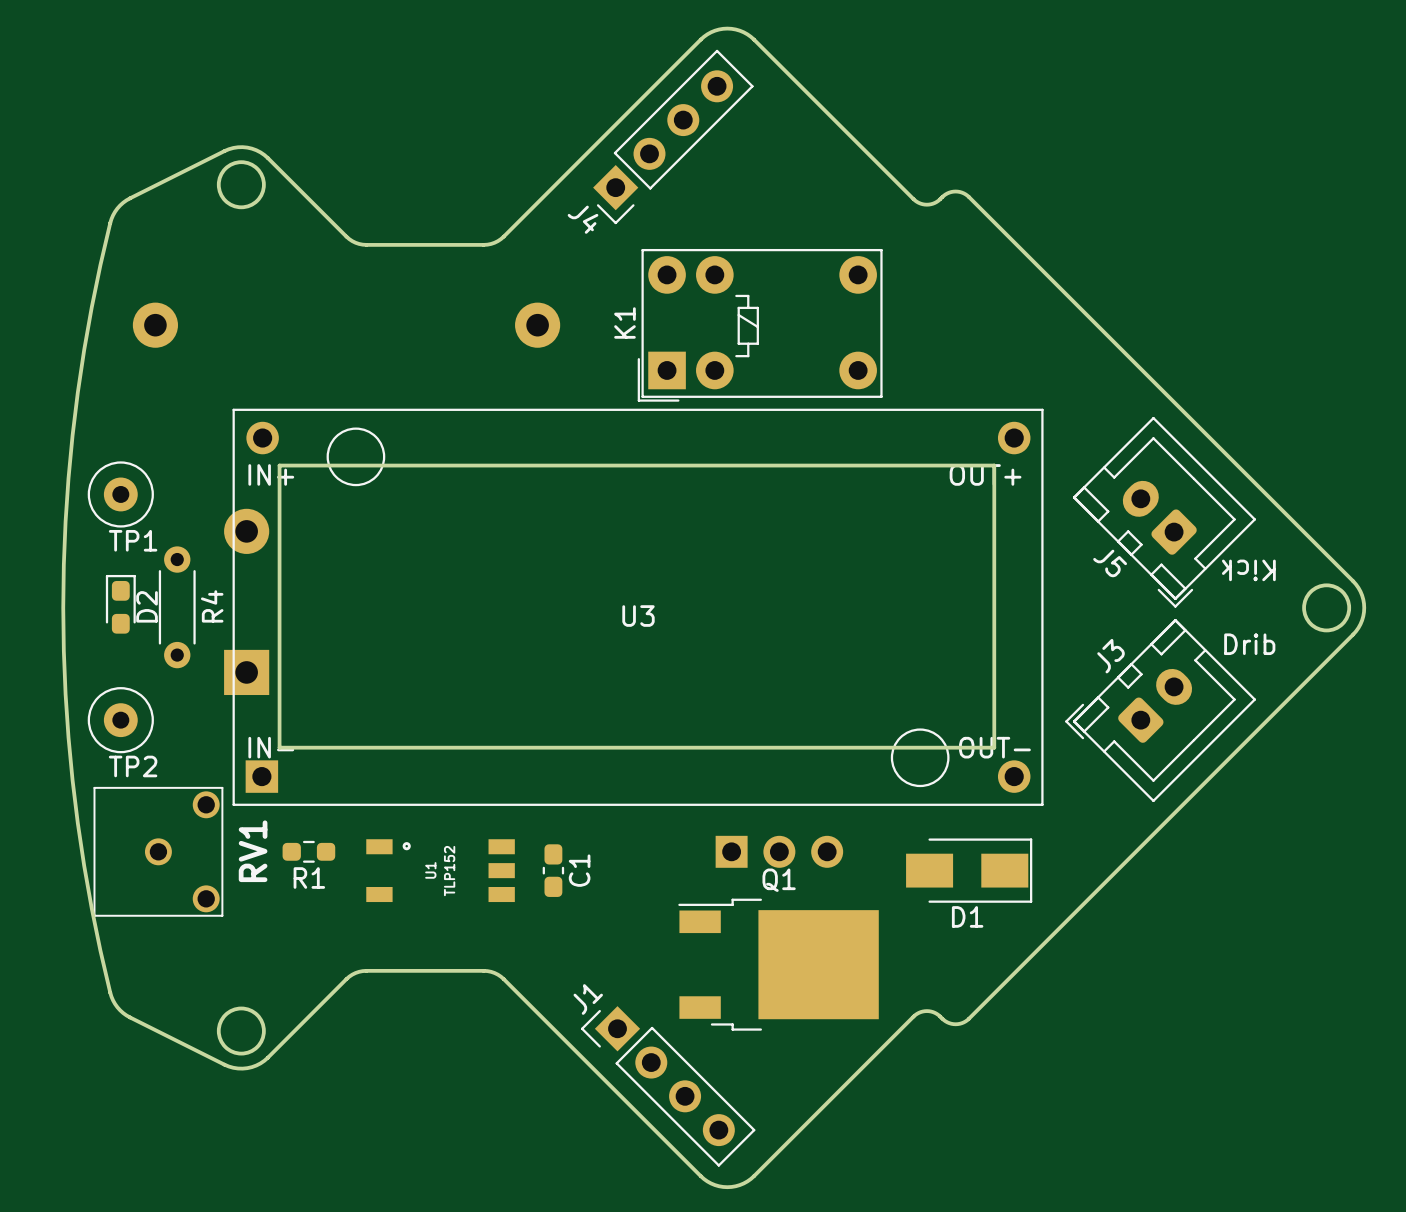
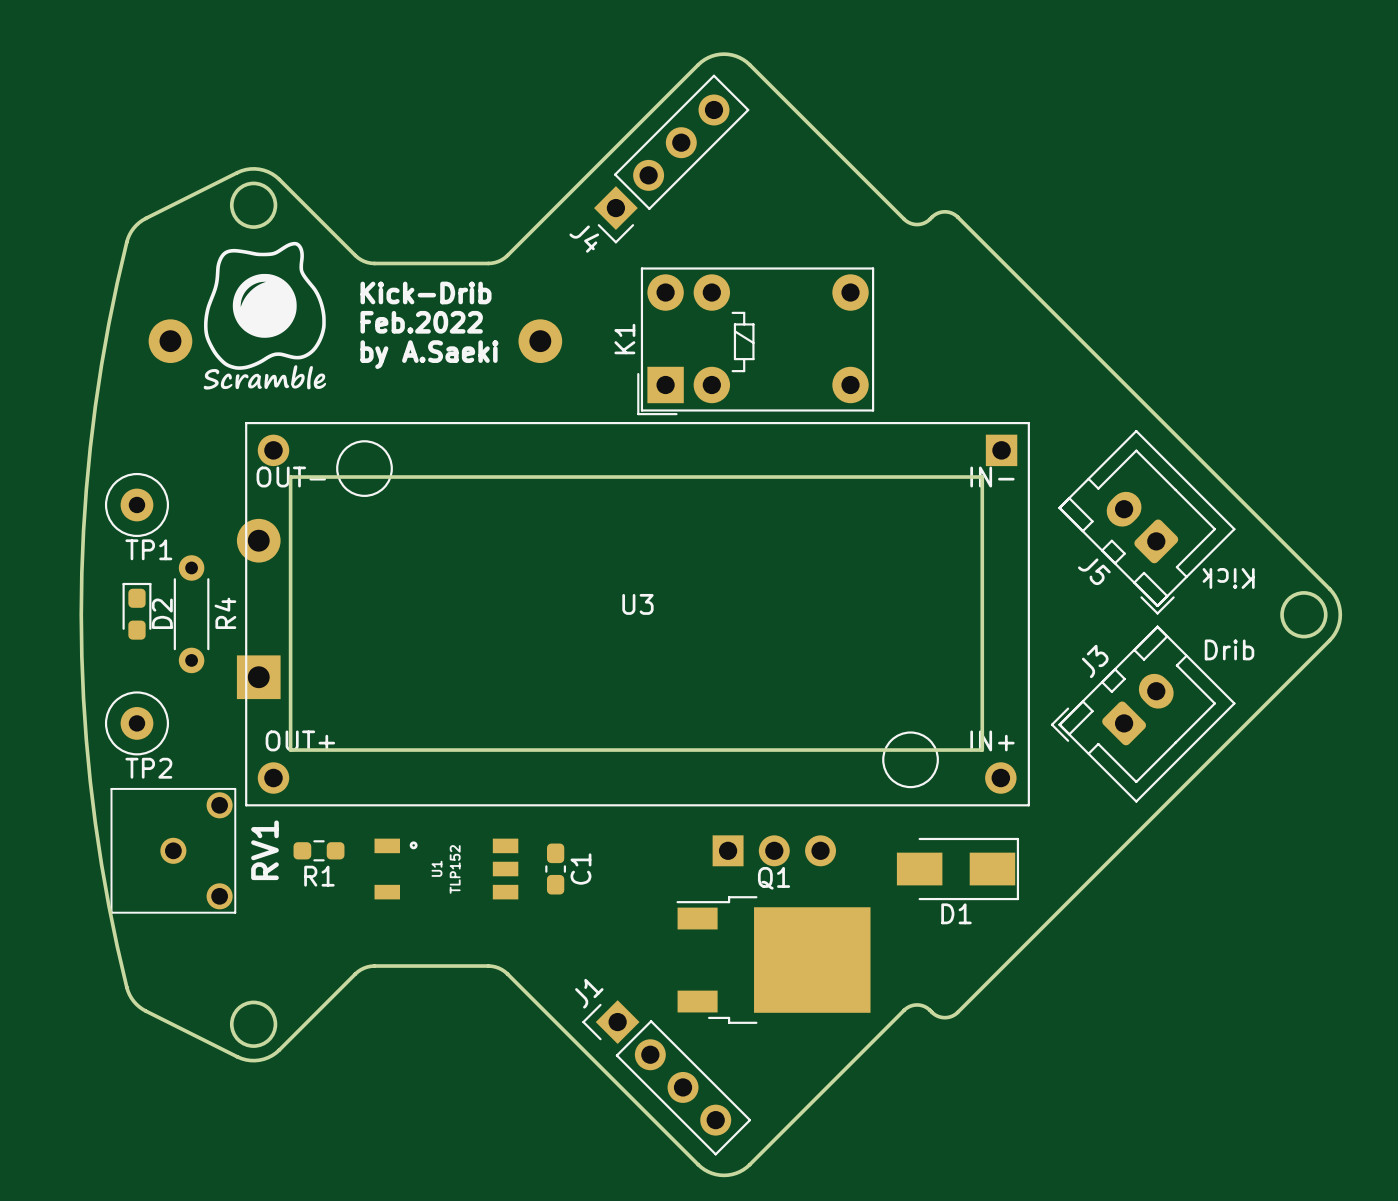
drawing: none -> [203, 241, 327, 390]
text: none -> Kick-Drib (426, 292)
text: none -> Feb.2022 (421, 322)
text: none -> by A.Saeki (429, 354)
U3 rotation: 0° (638, 607) -> 180° (637, 614)

